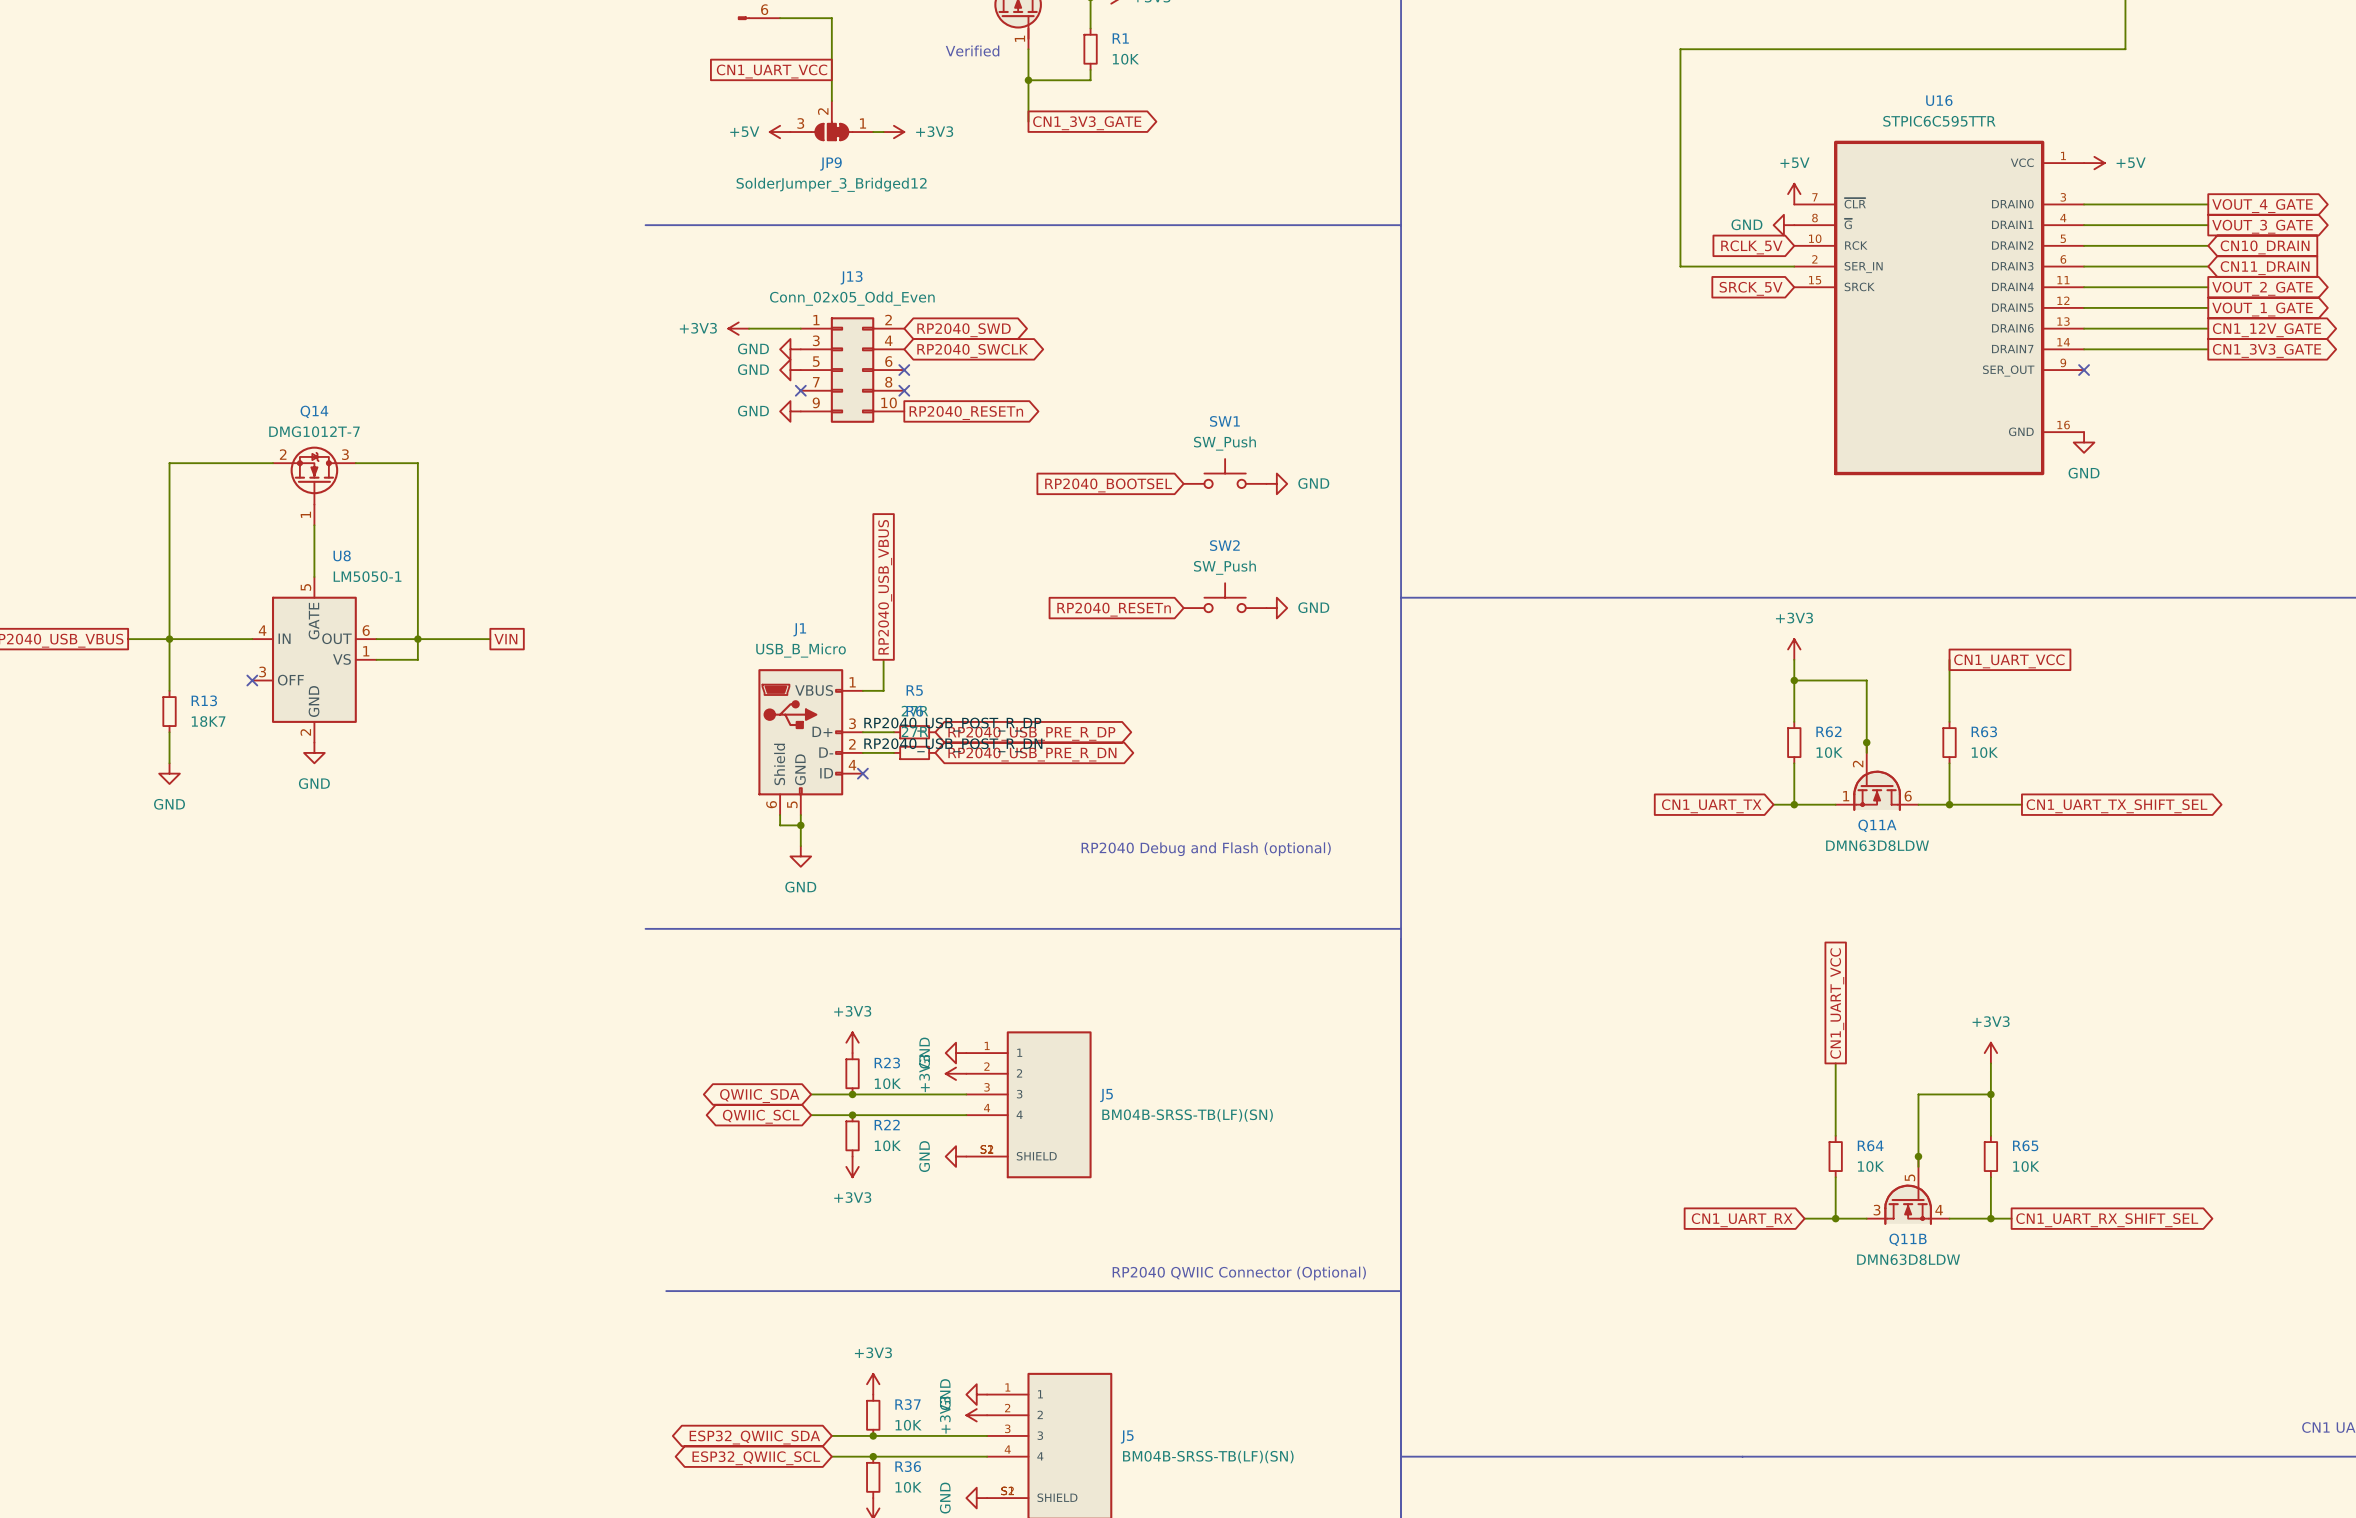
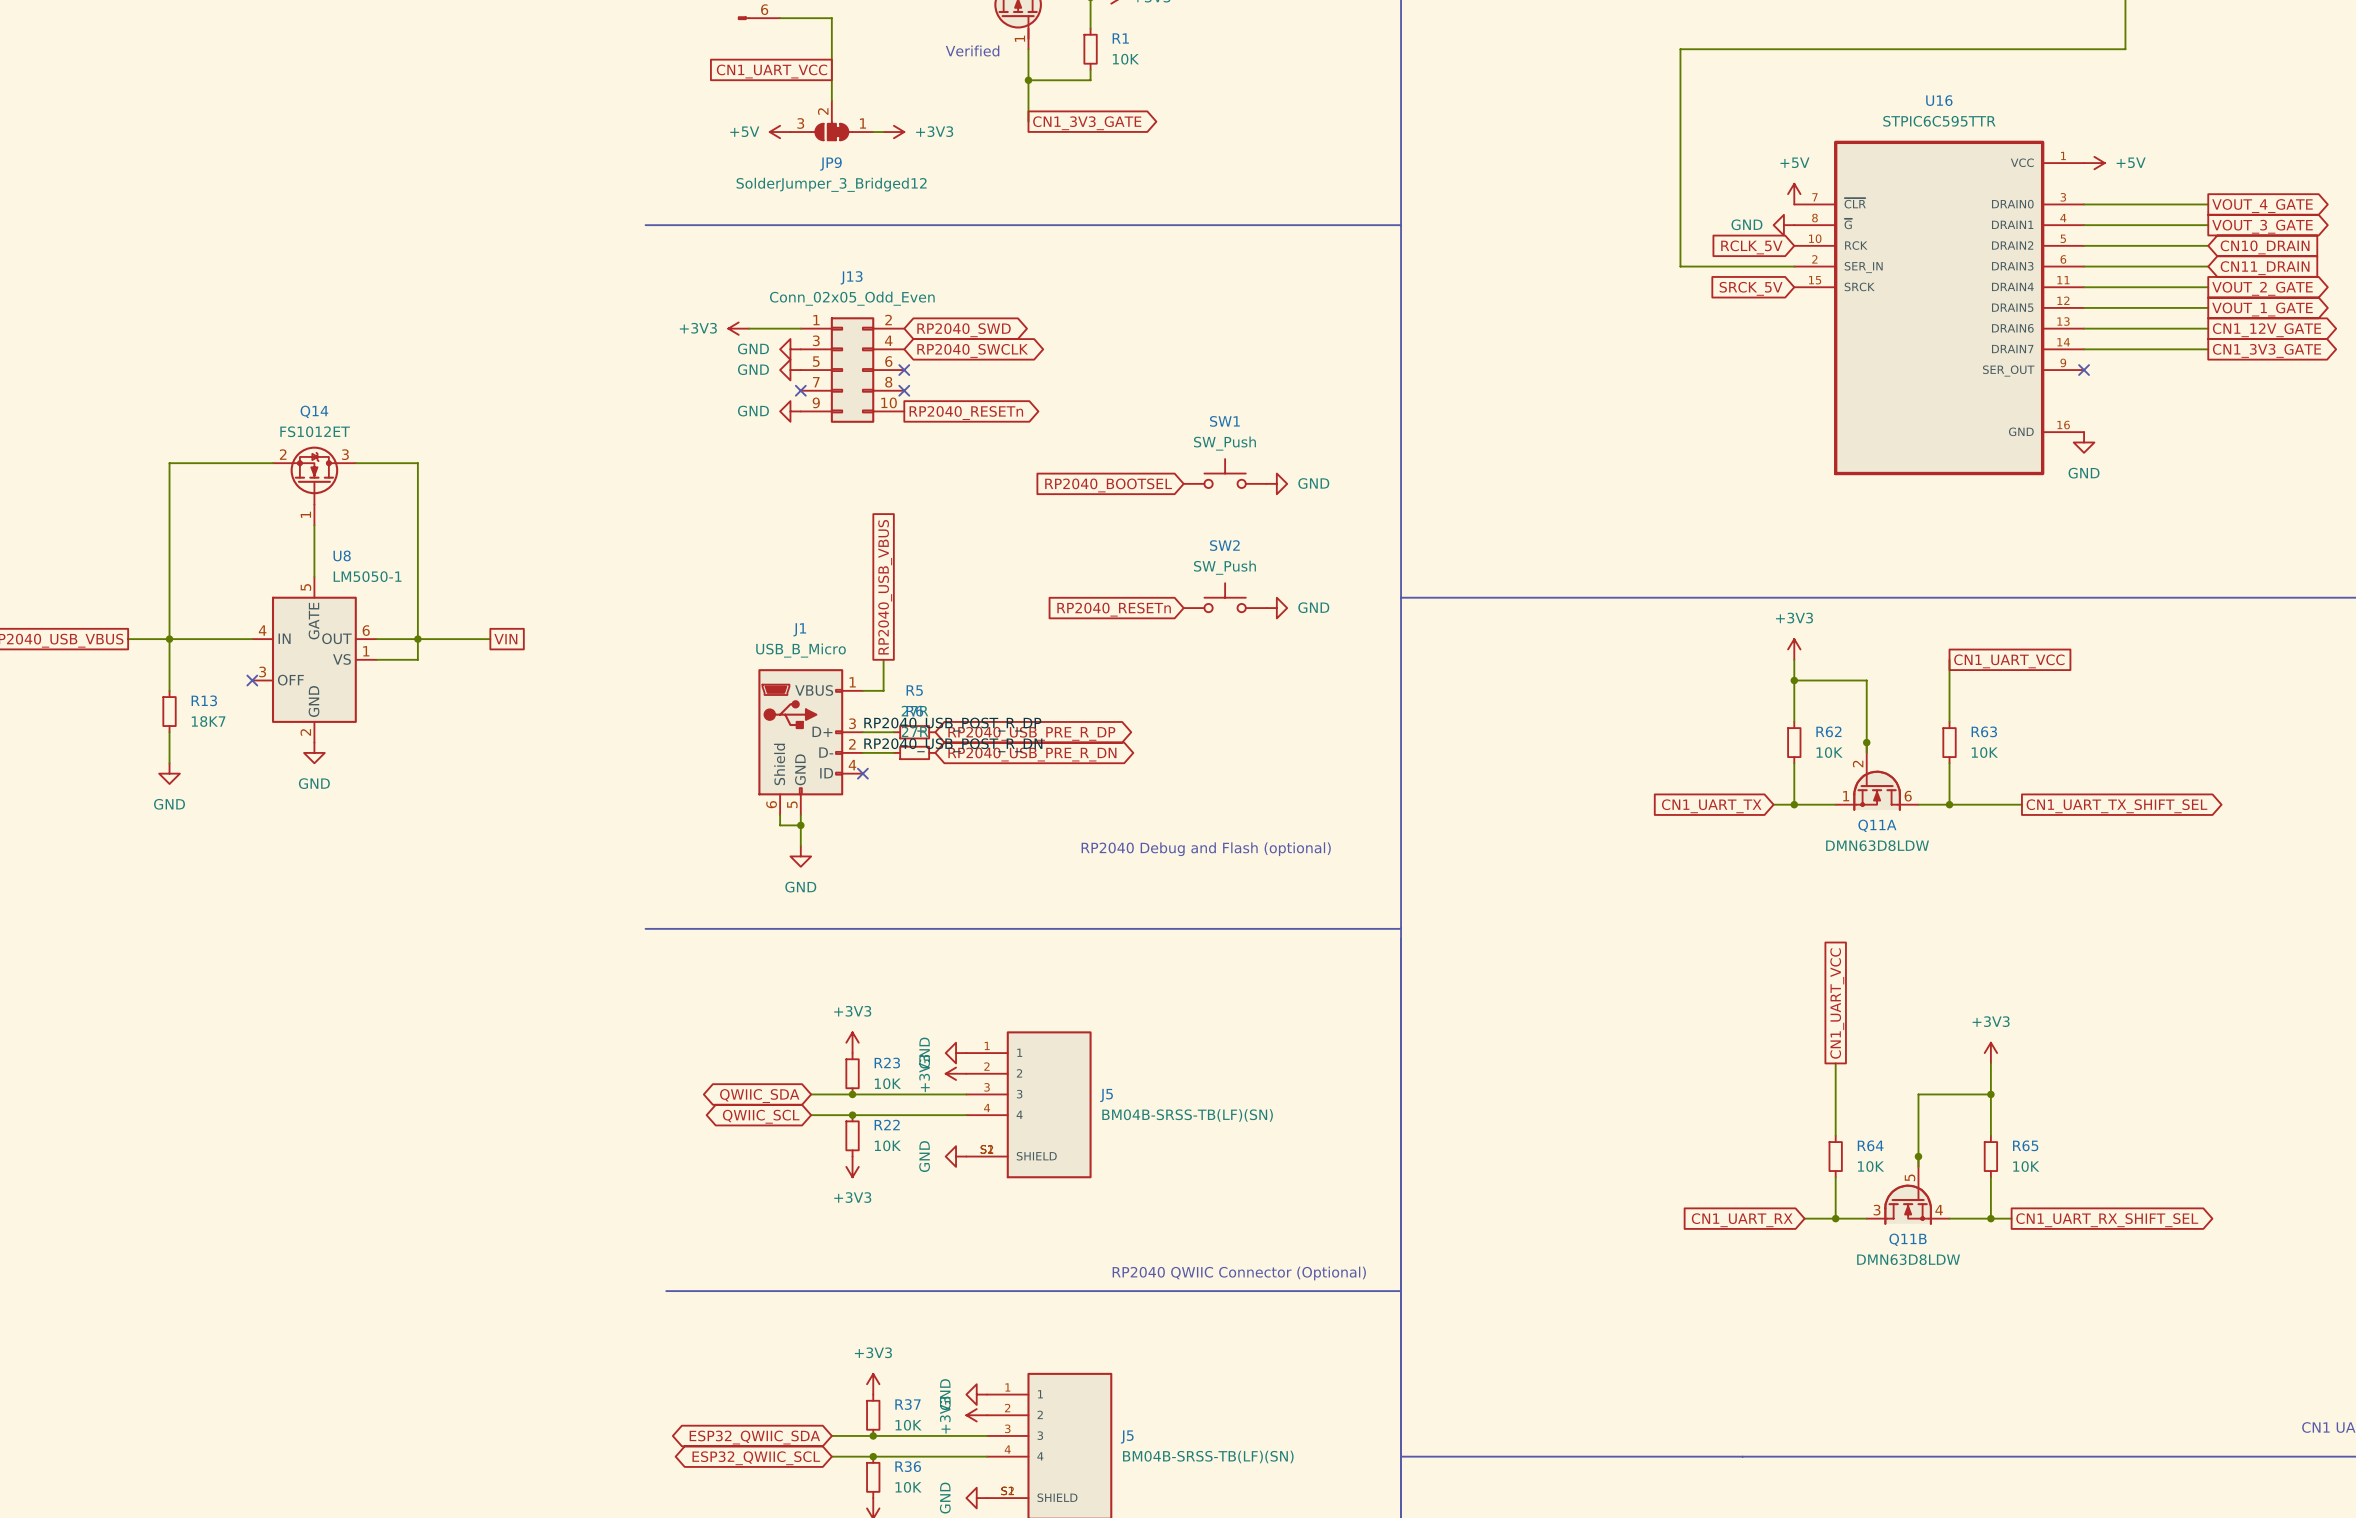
Q14 value: DMG1012T-7 (314, 431) -> FS1012ET (315, 431)

